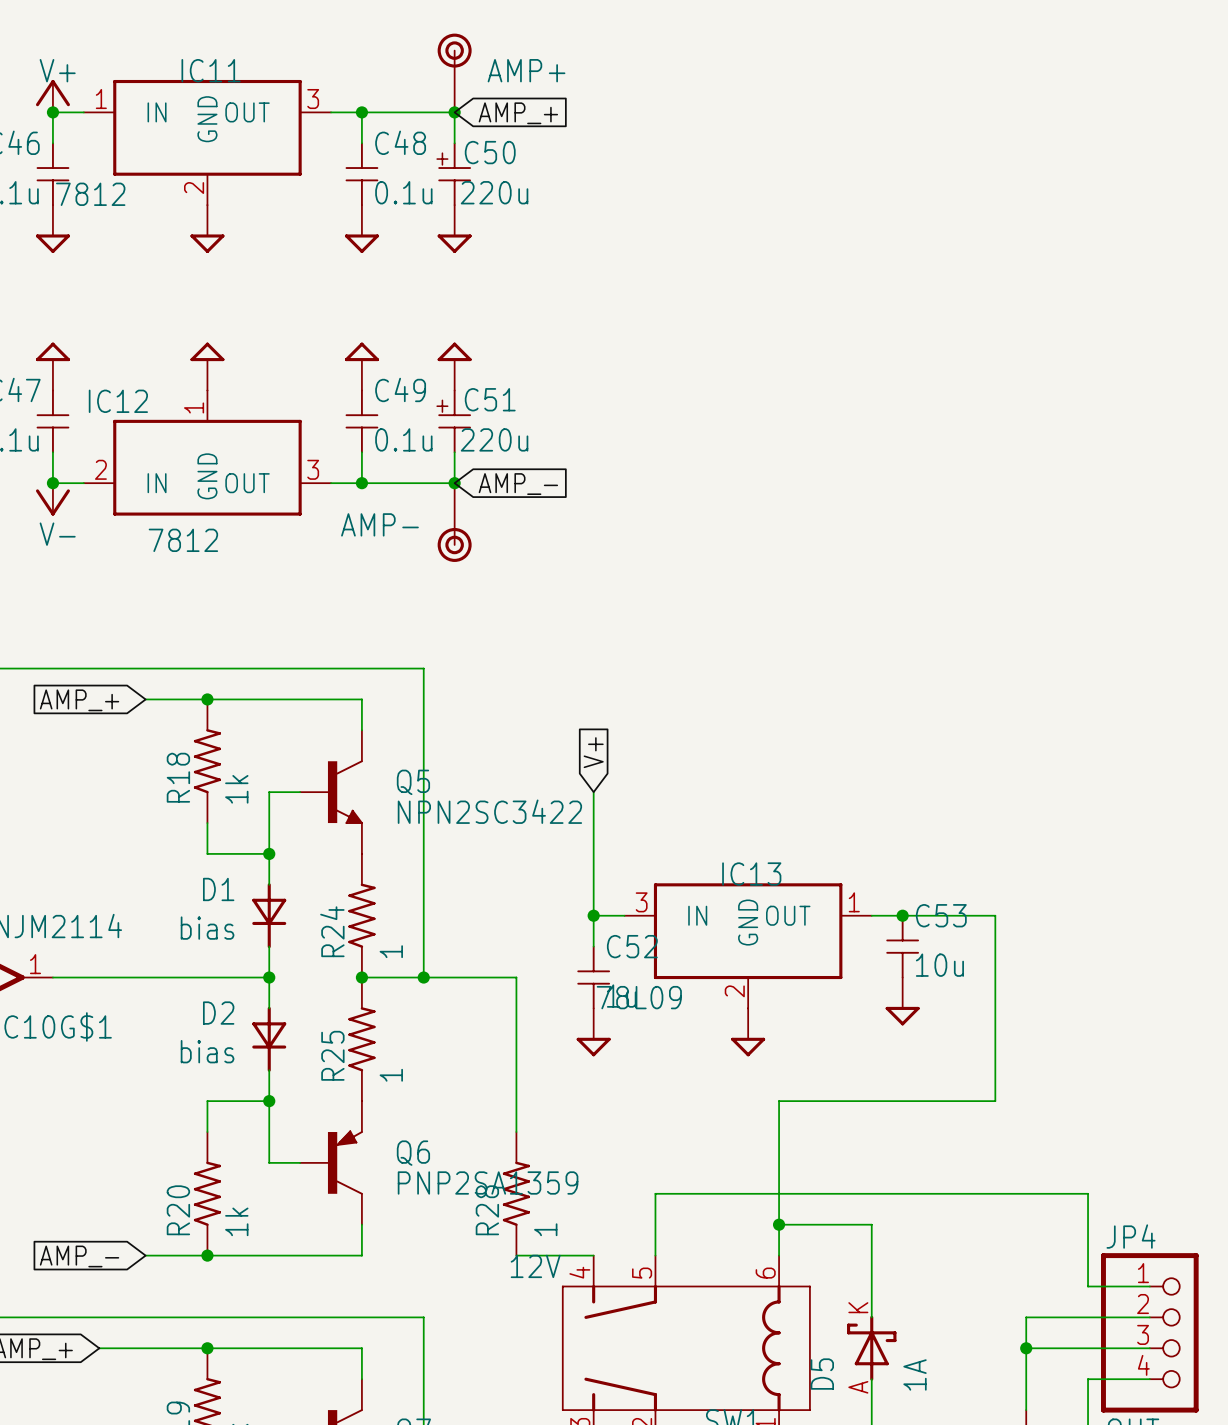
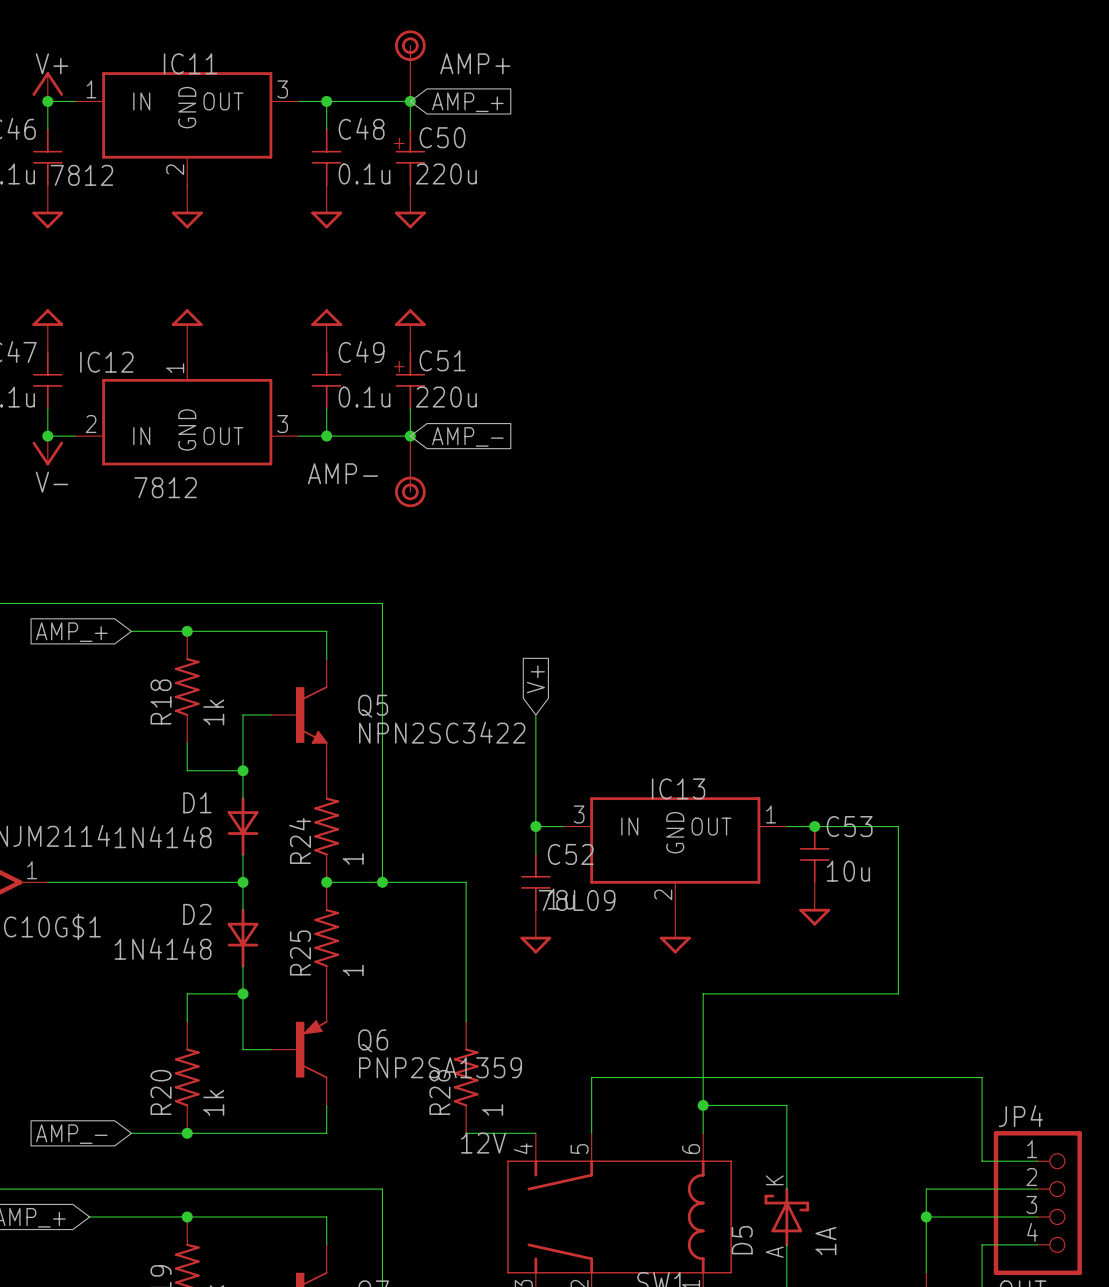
D1 value: bias (207, 928) -> 1N4148 (163, 837)
D2 value: bias (207, 1051) -> 1N4148 (163, 948)

